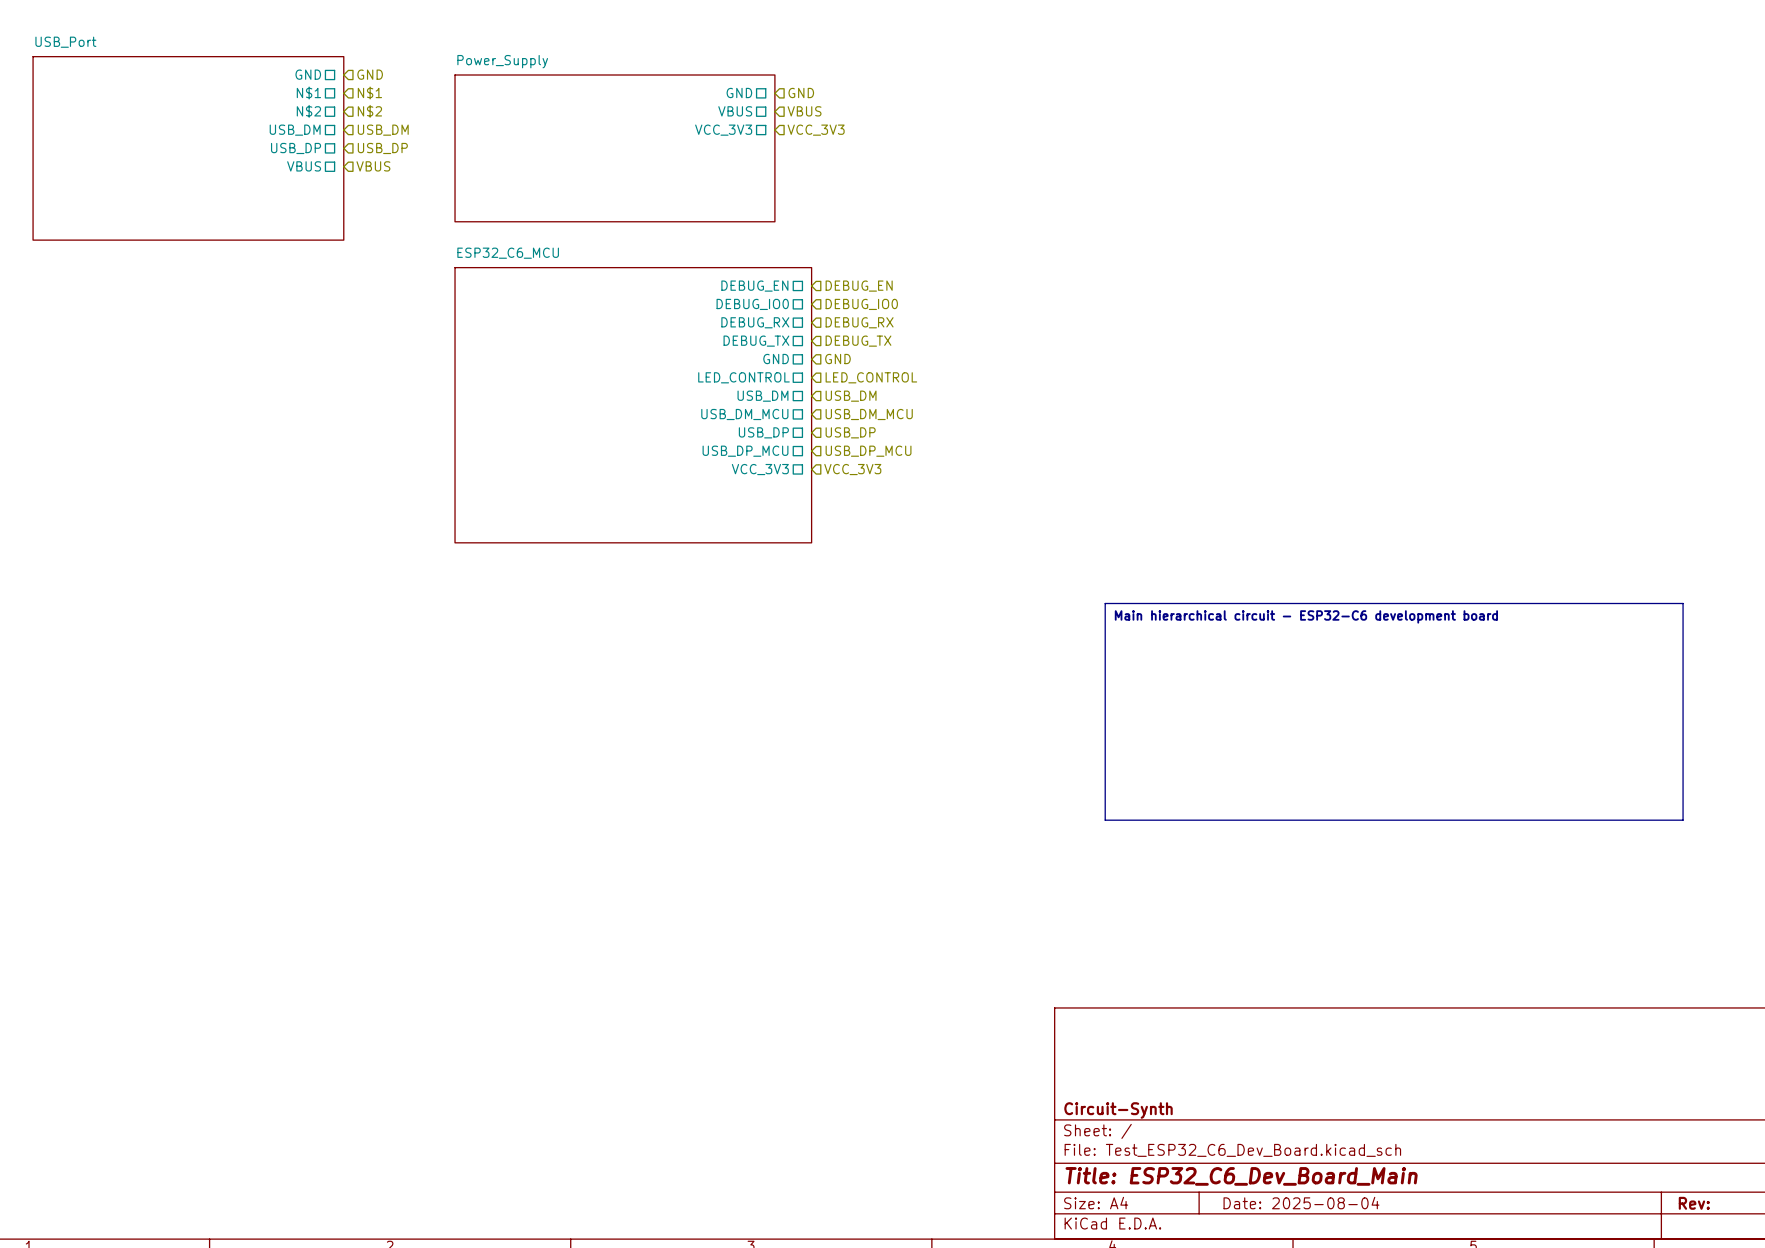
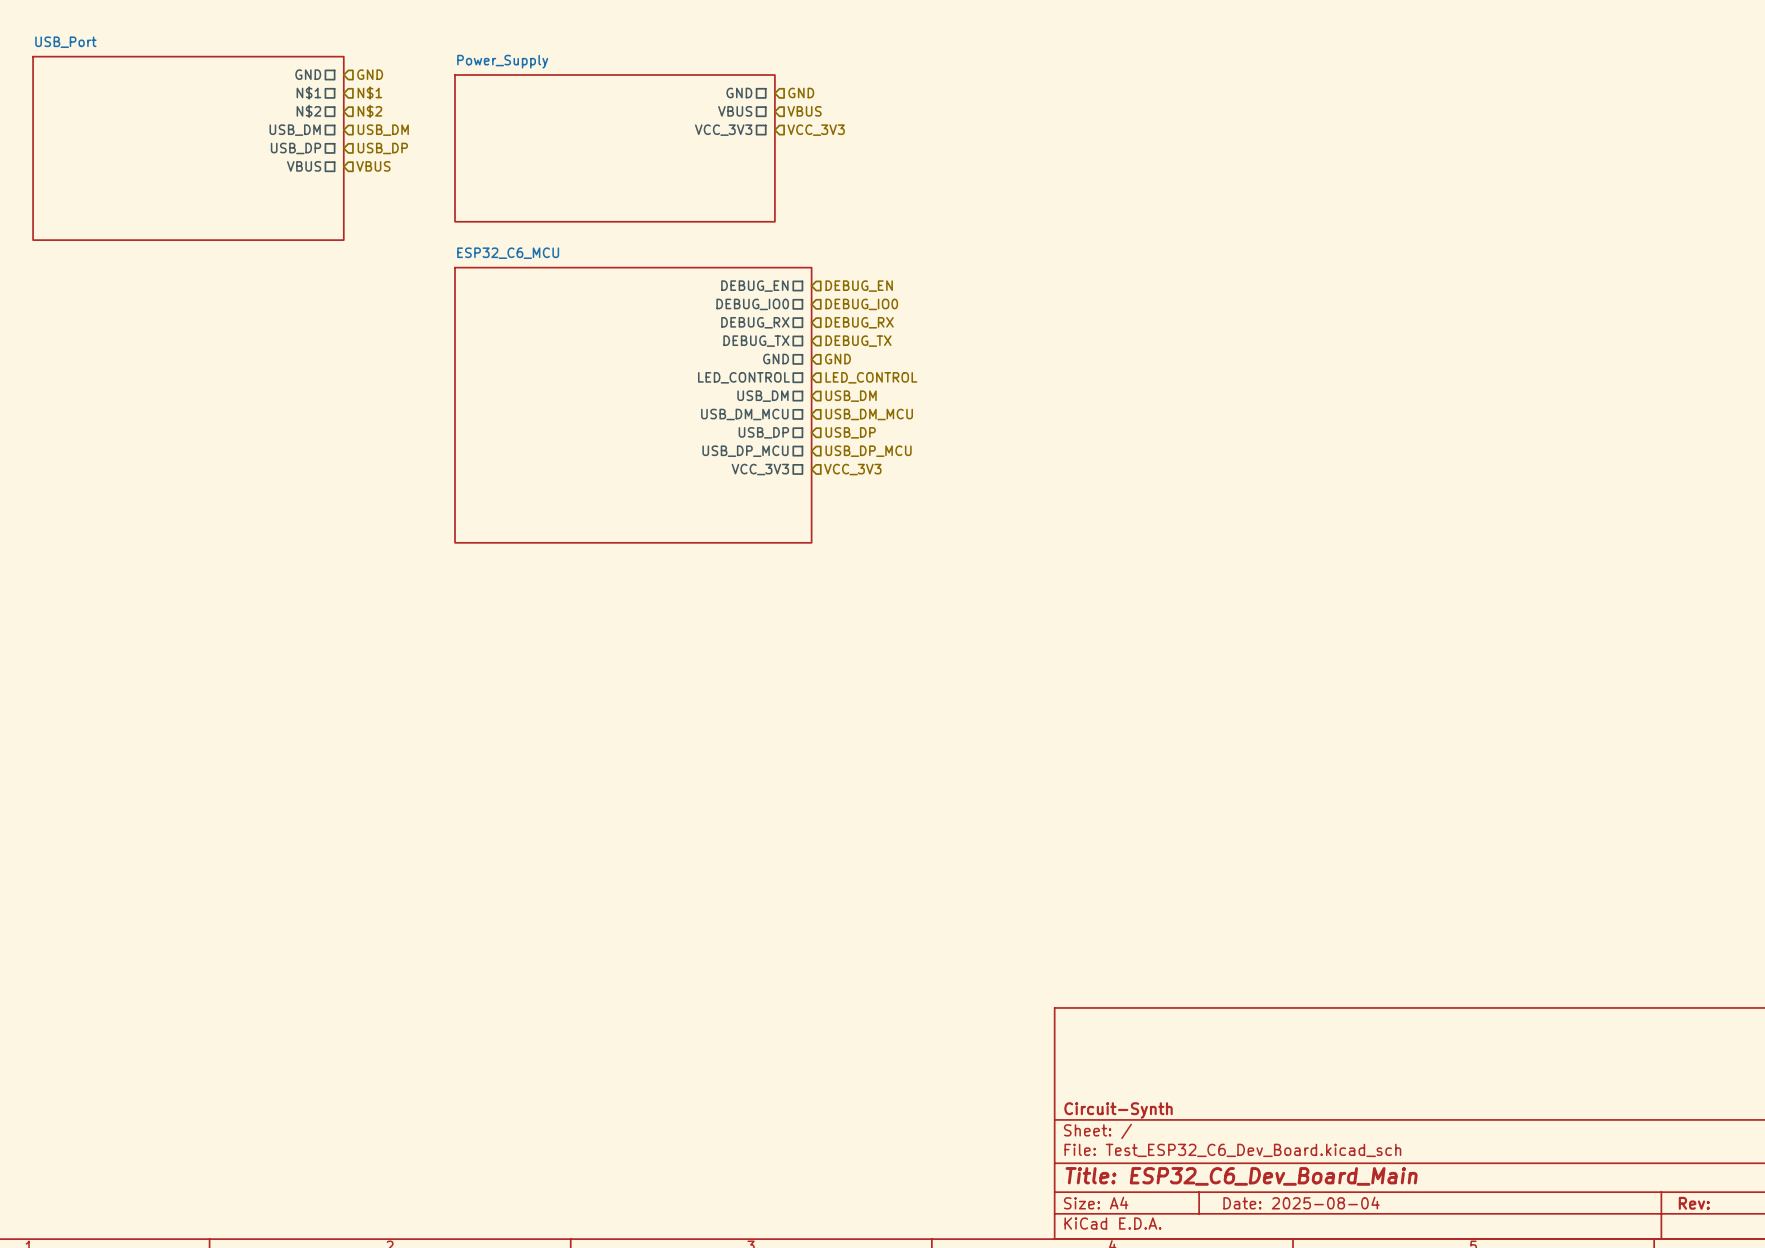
line: (1105, 603) (1683, 603) (1683, 820) (1105, 820) (1105, 603) -> none
text: Main hierarchical circuit - ESP32-C6 development board (1306, 616) -> none

